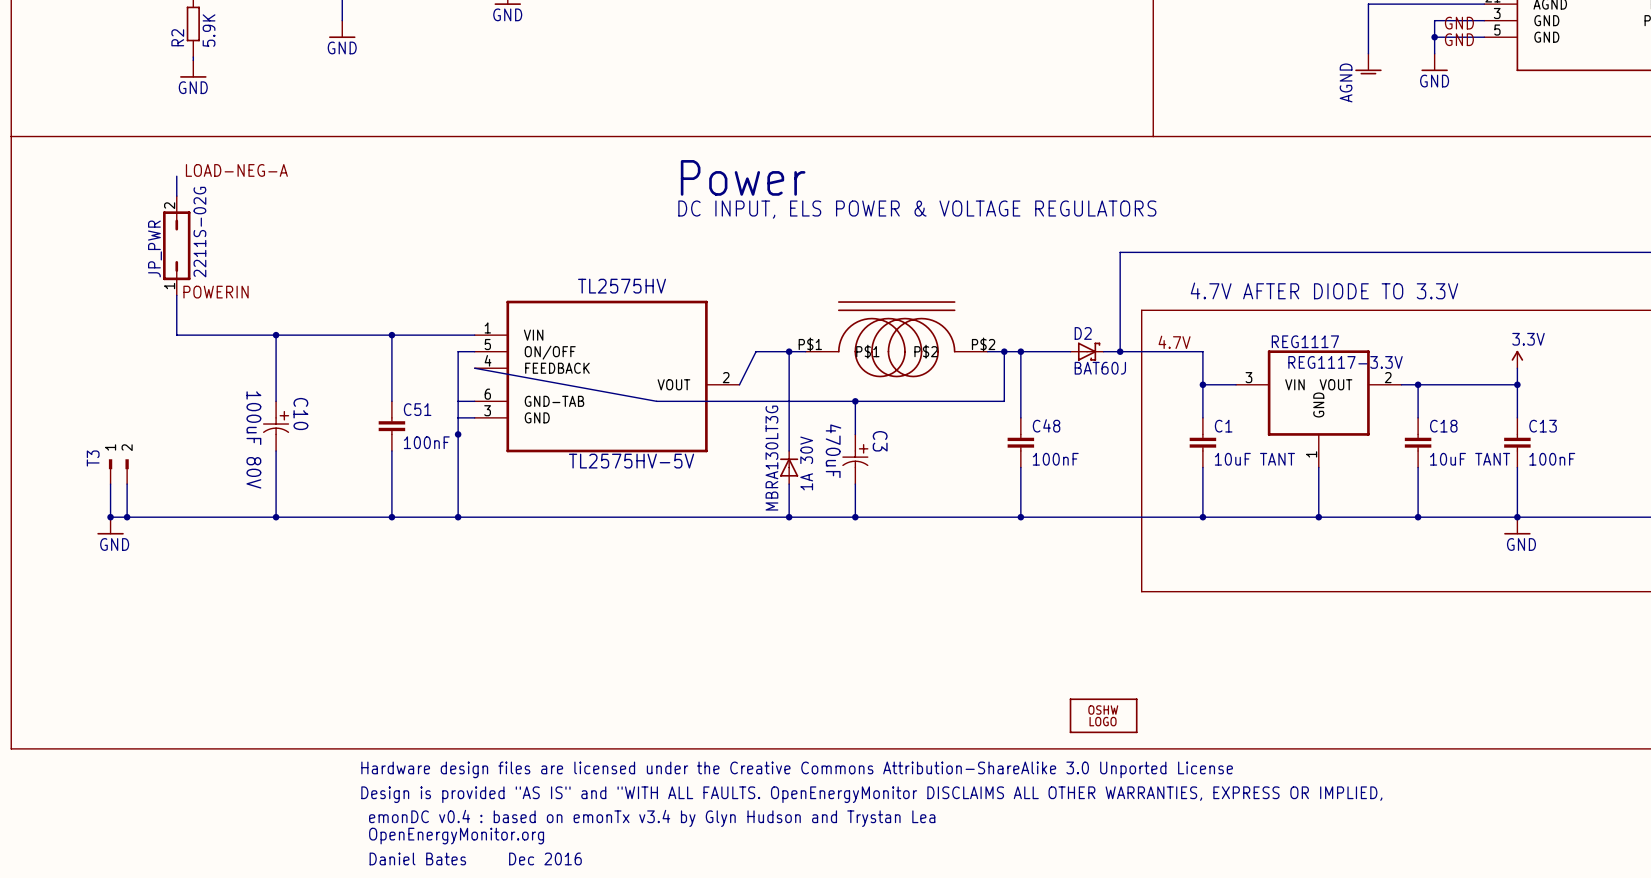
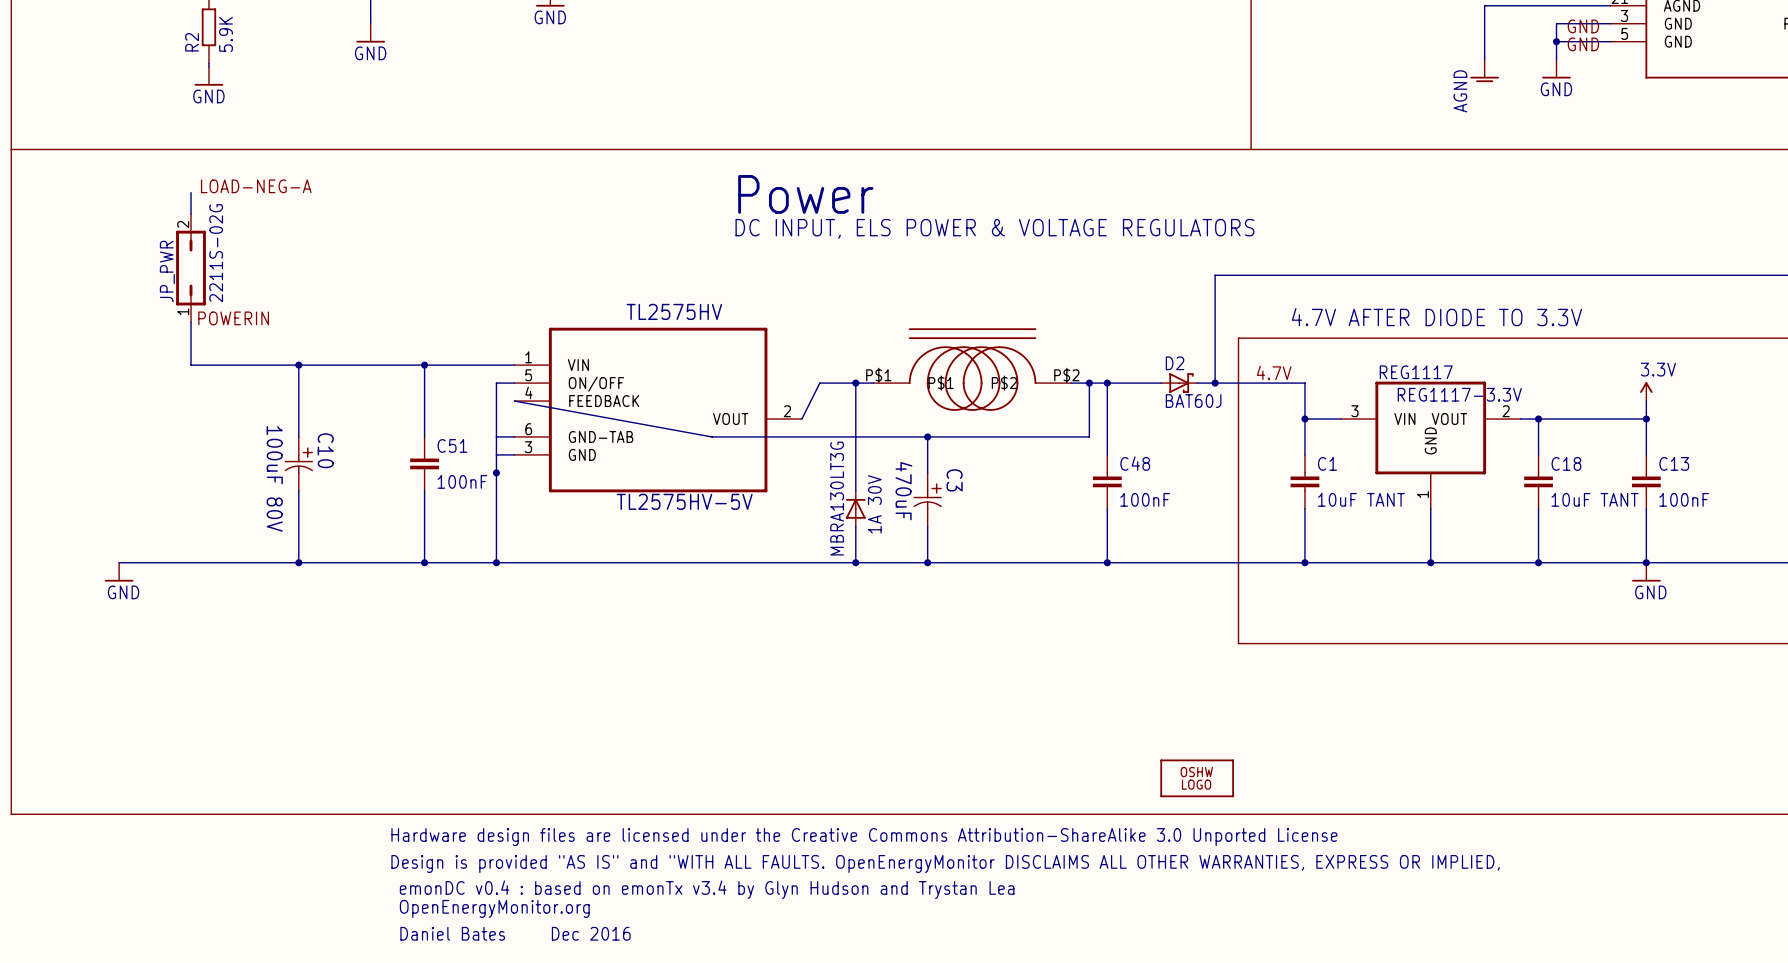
T3: (118, 471) -> none
wire: (110, 484) (110, 517) -> none
wire: (127, 484) (127, 517) -> none
junction: (110, 517) -> none
junction: (127, 517) -> none

